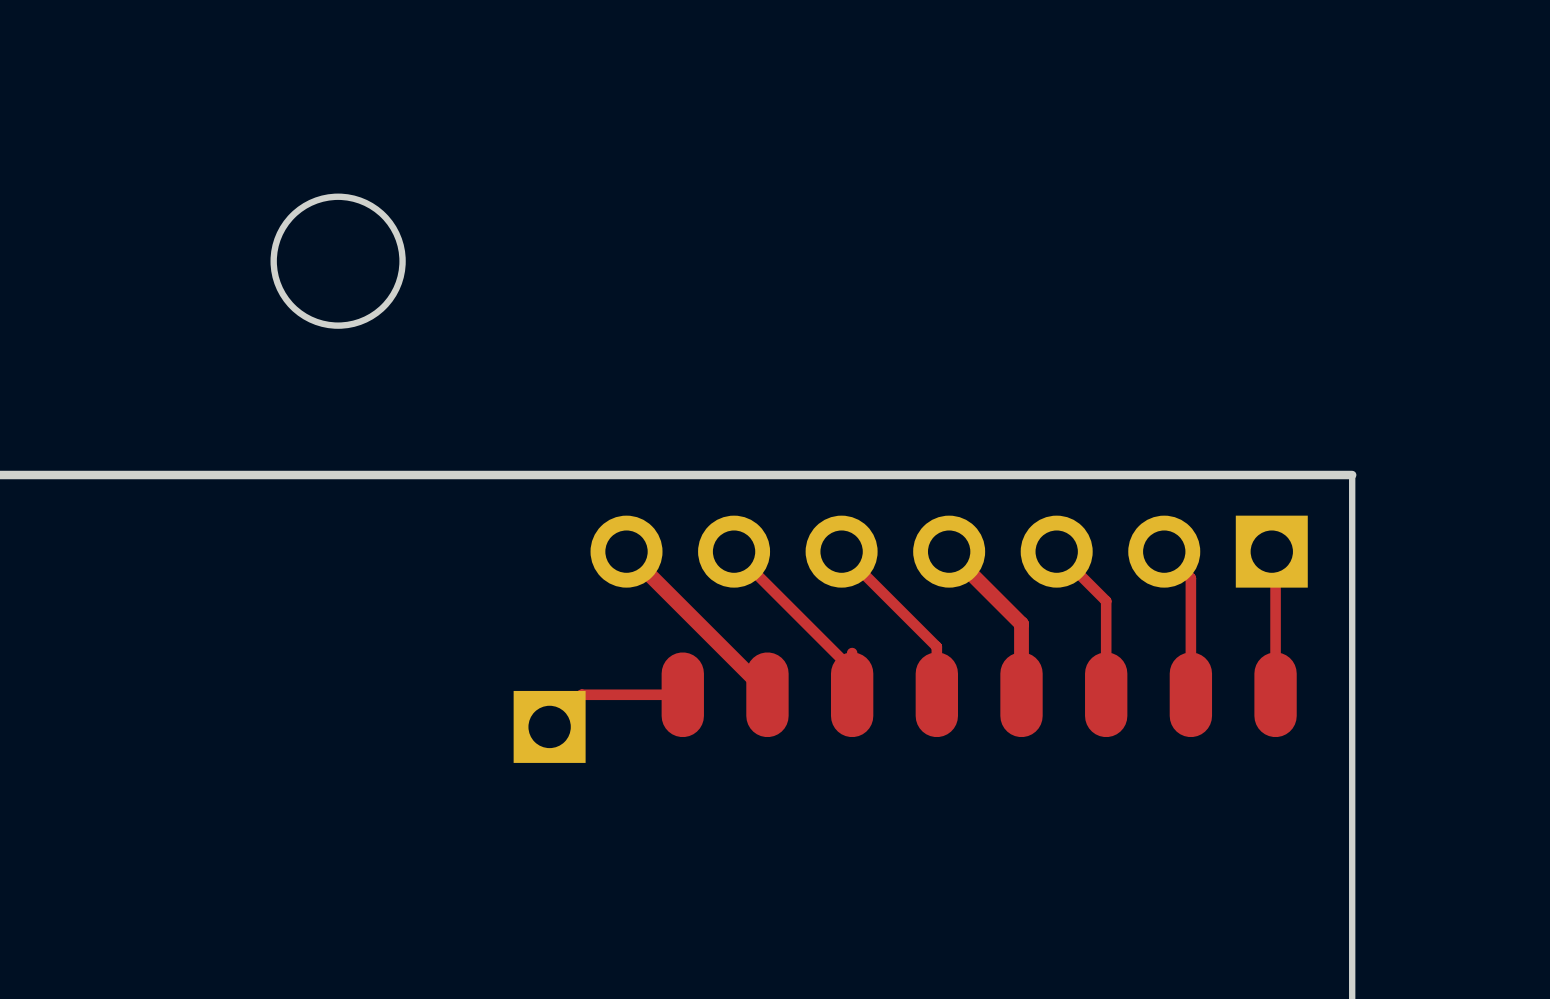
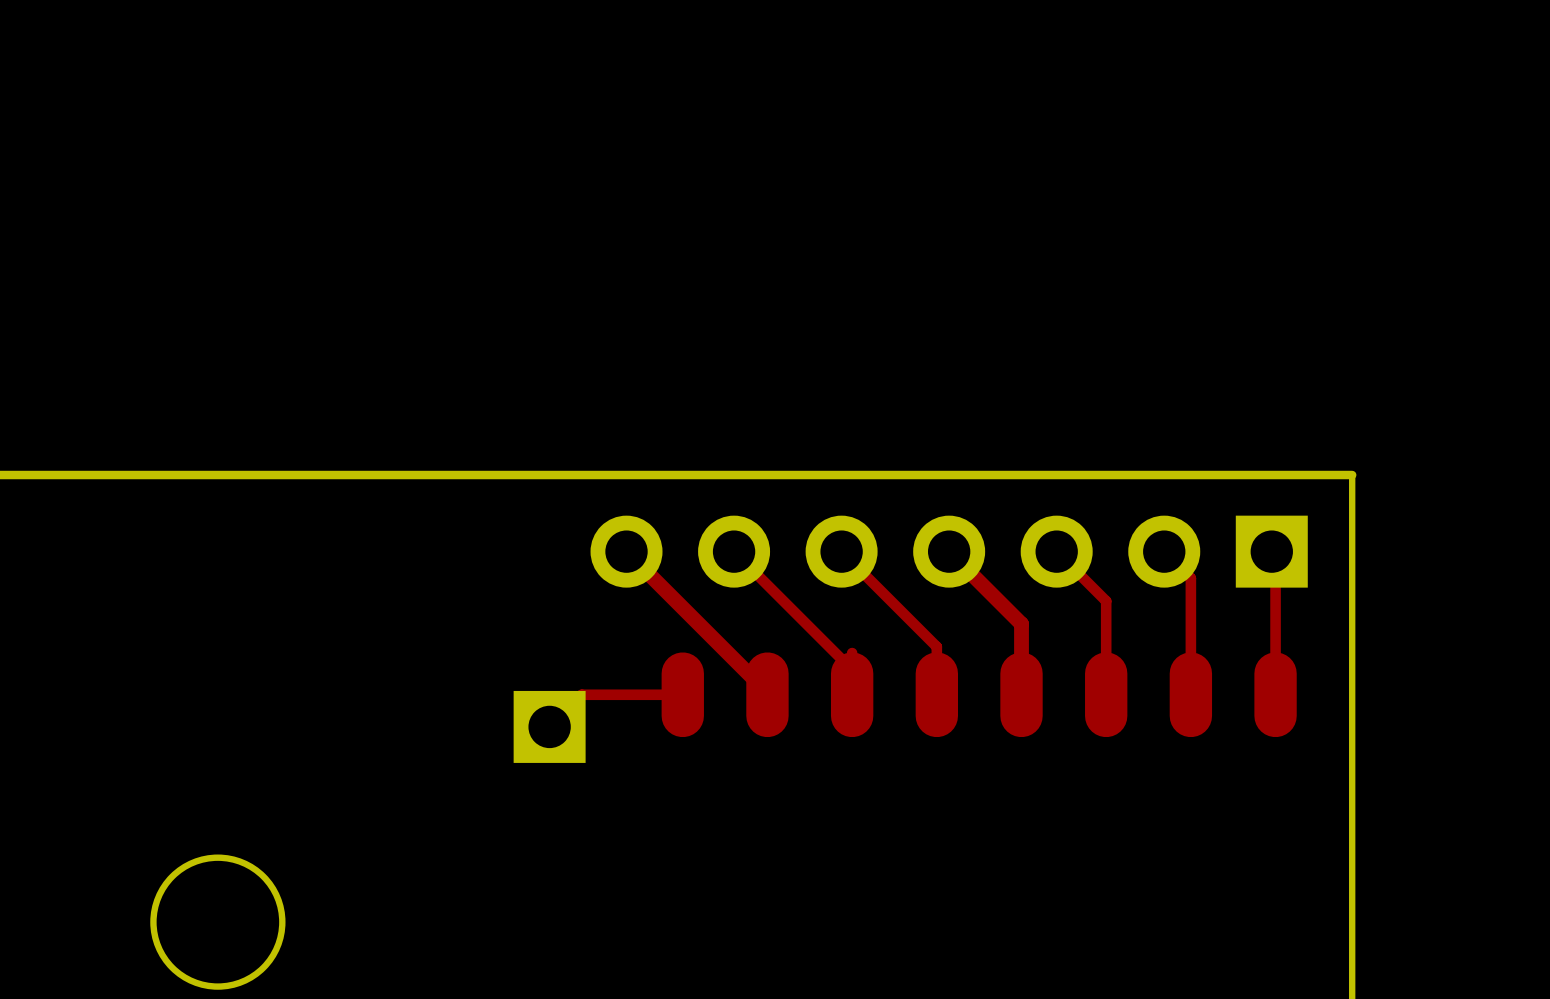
round board edge position: (338, 261) -> (217, 922)

